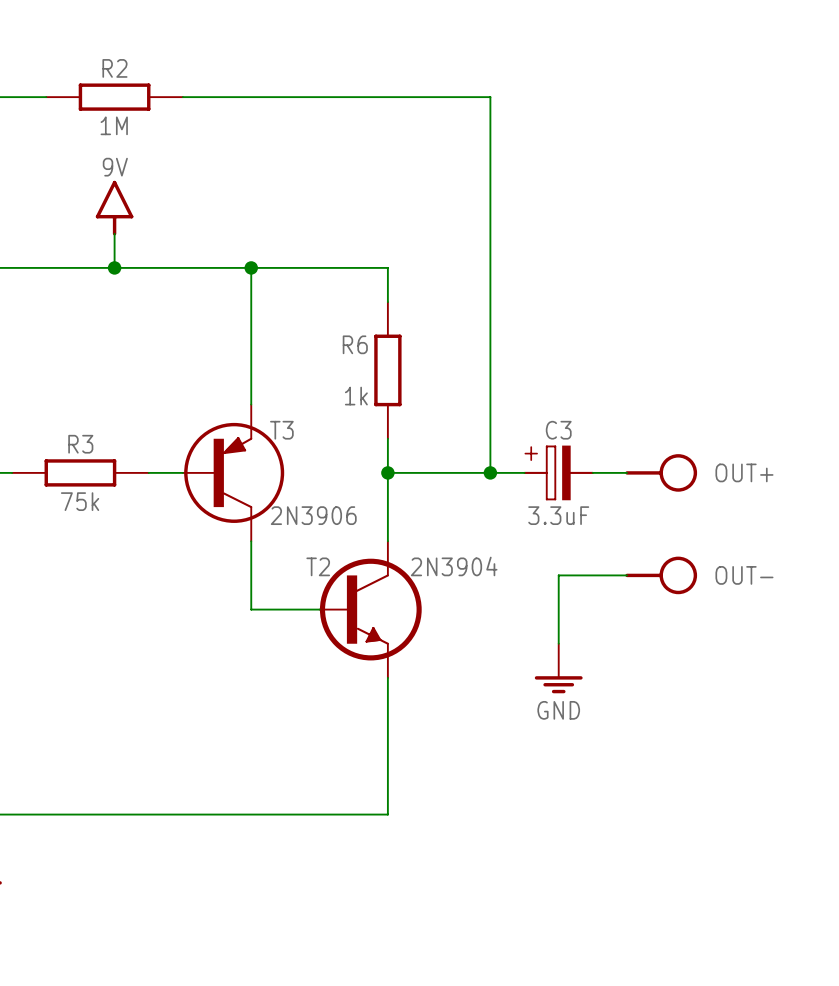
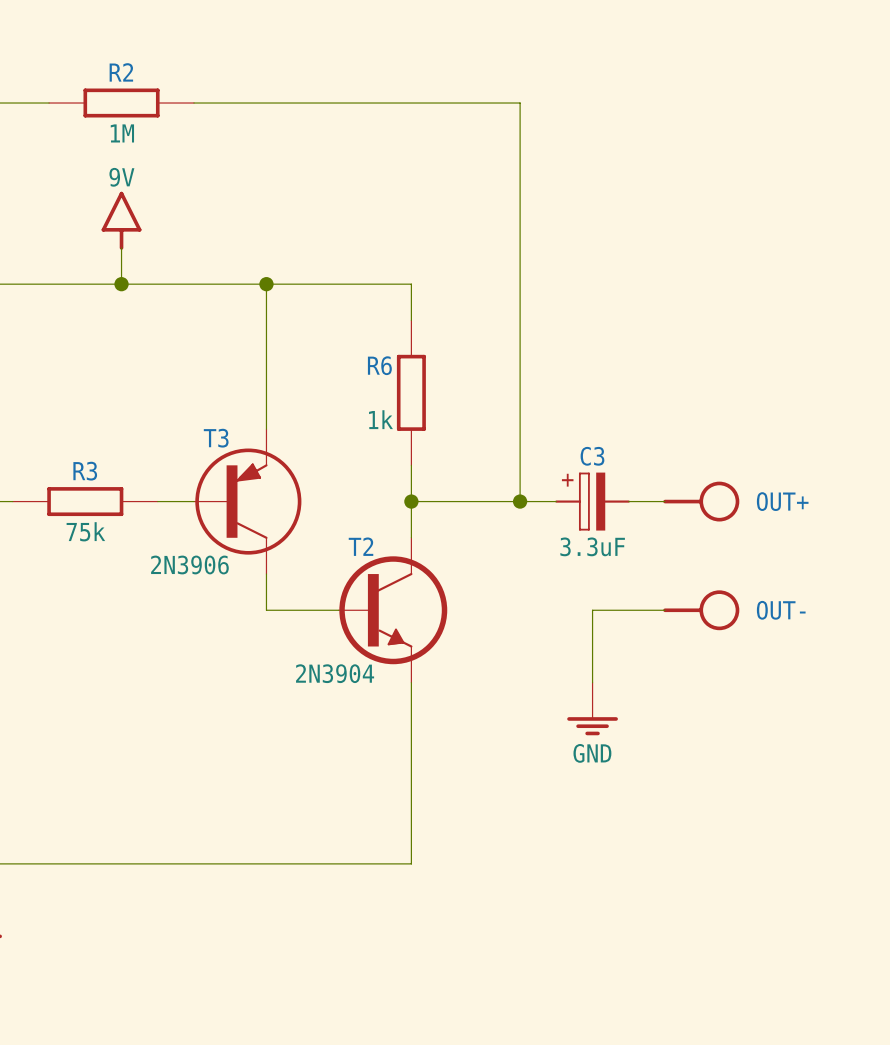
T3 name position: T3 (281, 430) -> T3 (216, 438)
T3 value position: 2N3906 (313, 515) -> 2N3906 (189, 564)
T2 name position: T2 (318, 566) -> T2 (361, 546)
T2 value position: 2N3904 (454, 566) -> 2N3904 (335, 673)
wire: (251, 575) (251, 609) (319, 609) -> (266, 610) (338, 610)
T2 position: (370, 609) -> (393, 610)

